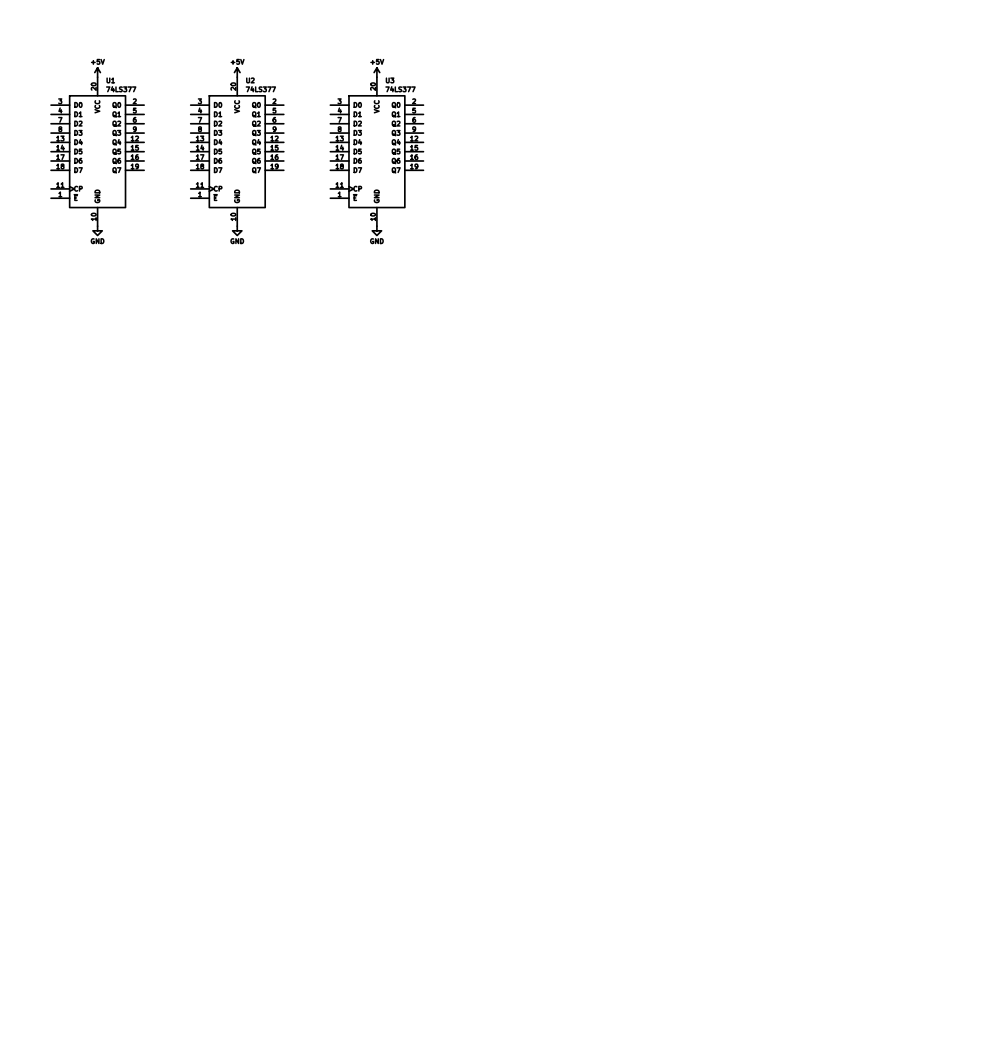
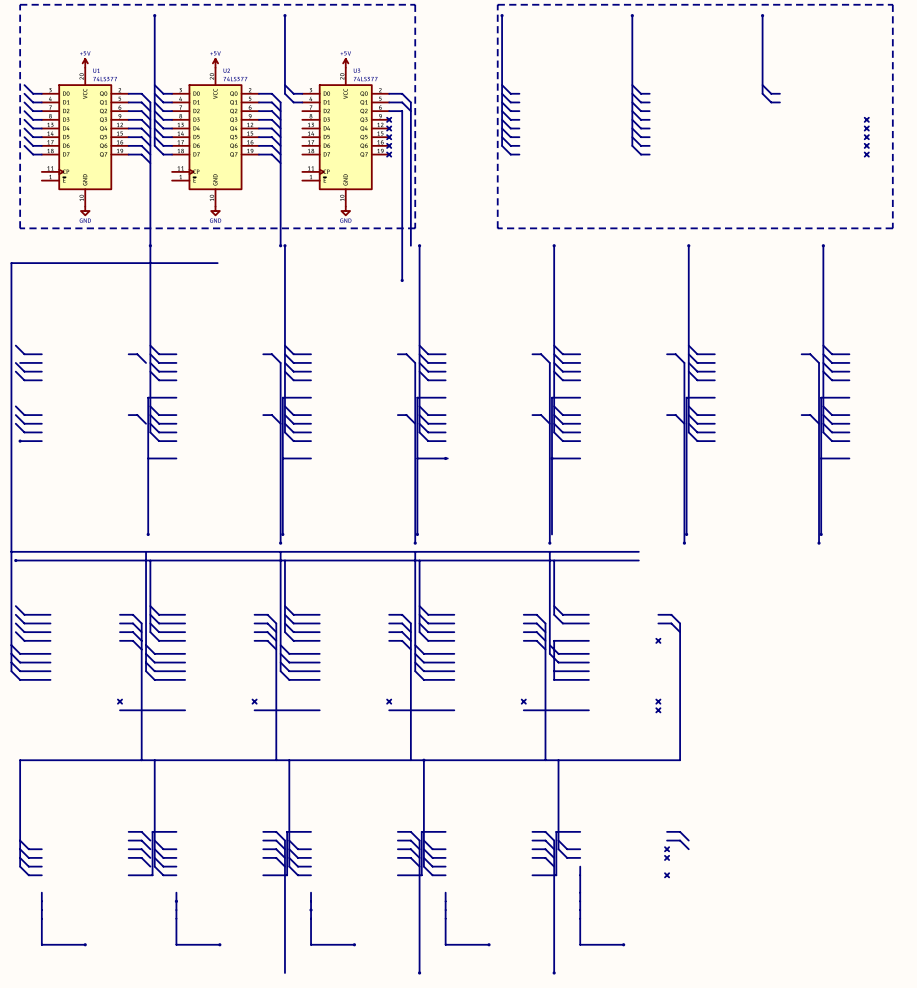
line: none -> (20, 4) (415, 4) (415, 228) (20, 228) (20, 4)
line: none -> (497, 4) (892, 4) (892, 228) (497, 228) (497, 4)
bus: none -> (154, 15) (154, 145)
junction: none -> (154, 15)
bus: none -> (284, 15) (284, 93)
junction: none -> (284, 15)
bus: none -> (502, 15) (502, 145)
junction: none -> (502, 15)
bus: none -> (632, 15) (632, 145)
junction: none -> (632, 15)
bus: none -> (762, 15) (762, 93)
junction: none -> (762, 15)
wire: none -> (24, 85) (33, 93) (41, 93)
wire: none -> (154, 85) (163, 93) (172, 93)
wire: none -> (284, 85) (293, 93) (302, 93)
wire: none -> (502, 85) (510, 93) (519, 93)
wire: none -> (632, 85) (641, 93) (649, 93)
wire: none -> (762, 85) (771, 93) (779, 93)
wire: none -> (24, 93) (33, 102) (41, 102)
wire: none -> (128, 93) (141, 93) (150, 102)
wire: none -> (154, 93) (163, 102) (172, 102)
wire: none -> (258, 93) (271, 93) (280, 102)
wire: none -> (284, 93) (293, 102) (302, 102)
wire: none -> (389, 93) (402, 93) (410, 102)
wire: none -> (502, 93) (510, 102) (519, 102)
wire: none -> (632, 93) (641, 102) (649, 102)
wire: none -> (762, 93) (771, 102) (779, 102)
wire: none -> (24, 102) (33, 111) (41, 111)
wire: none -> (128, 102) (141, 102) (150, 111)
bus: none -> (150, 102) (150, 432)
wire: none -> (154, 102) (163, 111) (172, 111)
wire: none -> (258, 102) (271, 102) (280, 111)
bus: none -> (280, 102) (280, 245)
wire: none -> (389, 102) (402, 102) (410, 111)
bus: none -> (410, 102) (410, 245)
wire: none -> (502, 102) (510, 111) (519, 111)
wire: none -> (632, 102) (641, 111) (649, 111)
wire: none -> (24, 111) (33, 119) (41, 119)
wire: none -> (128, 111) (141, 111) (150, 119)
wire: none -> (154, 111) (163, 119) (172, 119)
wire: none -> (258, 111) (271, 111) (280, 119)
wire: none -> (389, 111) (402, 111) (402, 280)
wire: none -> (502, 111) (510, 119) (519, 119)
wire: none -> (632, 111) (641, 119) (649, 119)
wire: none -> (24, 119) (33, 128) (41, 128)
wire: none -> (128, 119) (141, 119) (150, 128)
wire: none -> (154, 119) (163, 128) (172, 128)
wire: none -> (258, 119) (271, 119) (280, 128)
no-connect mark: none -> (389, 119)
wire: none -> (502, 119) (510, 128) (519, 128)
wire: none -> (632, 119) (641, 128) (649, 128)
no-connect mark: none -> (866, 119)
wire: none -> (24, 128) (33, 137) (41, 137)
wire: none -> (128, 128) (141, 128) (150, 137)
wire: none -> (154, 128) (163, 137) (172, 137)
wire: none -> (258, 128) (271, 128) (280, 137)
no-connect mark: none -> (389, 128)
wire: none -> (502, 128) (510, 137) (519, 137)
wire: none -> (632, 128) (641, 137) (649, 137)
no-connect mark: none -> (866, 128)
wire: none -> (24, 137) (33, 145) (41, 145)
wire: none -> (128, 137) (141, 137) (150, 145)
wire: none -> (154, 137) (163, 145) (172, 145)
wire: none -> (258, 137) (271, 137) (280, 145)
no-connect mark: none -> (389, 137)
wire: none -> (502, 137) (510, 145) (519, 145)
wire: none -> (632, 137) (641, 145) (649, 145)
no-connect mark: none -> (866, 137)
wire: none -> (24, 145) (33, 154) (41, 154)
wire: none -> (128, 145) (141, 145) (150, 154)
wire: none -> (154, 145) (163, 154) (172, 154)
wire: none -> (258, 145) (271, 145) (280, 154)
no-connect mark: none -> (389, 145)
wire: none -> (502, 145) (510, 154) (519, 154)
wire: none -> (632, 145) (641, 154) (649, 154)
no-connect mark: none -> (866, 145)
wire: none -> (128, 154) (141, 154) (150, 163)
wire: none -> (258, 154) (271, 154) (280, 163)
no-connect mark: none -> (389, 154)
no-connect mark: none -> (866, 154)
junction: none -> (150, 245)
junction: none -> (280, 245)
bus: none -> (284, 245) (284, 432)
junction: none -> (284, 245)
bus: none -> (419, 245) (419, 432)
junction: none -> (419, 245)
bus: none -> (554, 245) (554, 432)
junction: none -> (554, 245)
bus: none -> (688, 245) (688, 432)
junction: none -> (688, 245)
bus: none -> (823, 245) (823, 432)
junction: none -> (823, 245)
bus: none -> (217, 263) (11, 263) (11, 671)
junction: none -> (402, 280)
wire: none -> (15, 345) (24, 354) (41, 354)
wire: none -> (150, 345) (159, 354) (176, 354)
wire: none -> (284, 345) (293, 354) (311, 354)
wire: none -> (419, 345) (428, 354) (445, 354)
wire: none -> (554, 345) (562, 354) (580, 354)
wire: none -> (688, 345) (697, 354) (714, 354)
wire: none -> (823, 345) (832, 354) (849, 354)
wire: none -> (128, 354) (137, 354) (146, 362)
wire: none -> (150, 354) (159, 362) (176, 362)
wire: none -> (263, 354) (271, 354) (280, 362)
wire: none -> (284, 354) (293, 362) (311, 362)
wire: none -> (397, 354) (406, 354) (415, 362)
wire: none -> (419, 354) (428, 362) (445, 362)
wire: none -> (532, 354) (541, 354) (549, 362)
wire: none -> (554, 354) (562, 362) (580, 362)
wire: none -> (667, 354) (675, 354) (684, 362)
wire: none -> (688, 354) (697, 362) (714, 362)
wire: none -> (801, 354) (810, 354) (819, 362)
wire: none -> (823, 354) (832, 362) (849, 362)
wire: none -> (15, 362) (24, 371) (41, 371)
wire: none -> (20, 362) (41, 362)
wire: none -> (150, 362) (159, 371) (176, 371)
bus: none -> (280, 362) (280, 543)
wire: none -> (284, 362) (293, 371) (311, 371)
bus: none -> (415, 362) (415, 543)
wire: none -> (419, 362) (428, 371) (445, 371)
bus: none -> (549, 362) (549, 543)
wire: none -> (554, 362) (562, 371) (580, 371)
bus: none -> (684, 362) (684, 543)
wire: none -> (688, 362) (697, 371) (714, 371)
bus: none -> (819, 362) (819, 543)
wire: none -> (823, 362) (832, 371) (849, 371)
wire: none -> (15, 371) (24, 380) (41, 380)
wire: none -> (150, 371) (159, 380) (176, 380)
wire: none -> (284, 371) (293, 380) (311, 380)
wire: none -> (419, 371) (428, 380) (445, 380)
wire: none -> (554, 371) (562, 380) (580, 380)
wire: none -> (688, 371) (697, 380) (714, 380)
wire: none -> (823, 371) (832, 380) (849, 380)
wire: none -> (176, 397) (148, 397) (148, 534)
wire: none -> (311, 397) (282, 397) (282, 534)
wire: none -> (445, 397) (417, 397) (417, 534)
wire: none -> (580, 397) (552, 397) (552, 534)
wire: none -> (714, 397) (686, 397) (686, 534)
wire: none -> (849, 397) (821, 397) (821, 534)
wire: none -> (15, 406) (24, 415) (41, 415)
wire: none -> (150, 406) (159, 415) (176, 415)
wire: none -> (284, 406) (293, 415) (311, 415)
wire: none -> (419, 406) (428, 415) (445, 415)
wire: none -> (554, 406) (562, 415) (580, 415)
wire: none -> (688, 406) (697, 415) (714, 415)
wire: none -> (823, 406) (832, 415) (849, 415)
wire: none -> (15, 415) (24, 423) (41, 423)
wire: none -> (128, 415) (137, 415) (146, 423)
wire: none -> (150, 415) (159, 423) (176, 423)
wire: none -> (263, 415) (271, 415) (280, 423)
wire: none -> (284, 415) (293, 423) (311, 423)
wire: none -> (397, 415) (406, 415) (415, 423)
wire: none -> (419, 415) (428, 423) (445, 423)
wire: none -> (532, 415) (541, 415) (549, 423)
wire: none -> (554, 415) (562, 423) (580, 423)
wire: none -> (667, 415) (675, 415) (684, 423)
wire: none -> (688, 415) (697, 423) (714, 423)
wire: none -> (801, 415) (810, 415) (819, 423)
wire: none -> (823, 415) (832, 423) (849, 423)
wire: none -> (15, 423) (24, 432) (41, 432)
wire: none -> (150, 423) (159, 432) (176, 432)
wire: none -> (284, 423) (293, 432) (311, 432)
wire: none -> (419, 423) (428, 432) (445, 432)
wire: none -> (554, 423) (562, 432) (580, 432)
wire: none -> (688, 423) (697, 432) (714, 432)
wire: none -> (823, 423) (832, 432) (849, 432)
wire: none -> (150, 432) (159, 441) (176, 441)
wire: none -> (284, 432) (293, 441) (311, 441)
wire: none -> (419, 432) (428, 441) (445, 441)
wire: none -> (554, 432) (562, 441) (580, 441)
wire: none -> (688, 432) (697, 441) (714, 441)
wire: none -> (823, 432) (832, 441) (849, 441)
wire: none -> (20, 441) (41, 441)
junction: none -> (20, 441)
wire: none -> (148, 458) (176, 458)
wire: none -> (282, 458) (311, 458)
wire: none -> (417, 458) (447, 458)
junction: none -> (445, 458)
wire: none -> (552, 458) (580, 458)
wire: none -> (821, 458) (849, 458)
junction: none -> (148, 534)
junction: none -> (282, 534)
junction: none -> (417, 534)
junction: none -> (686, 534)
junction: none -> (821, 534)
junction: none -> (280, 543)
junction: none -> (415, 543)
junction: none -> (549, 543)
junction: none -> (684, 543)
junction: none -> (819, 543)
bus: none -> (11, 551) (638, 551)
bus: none -> (146, 551) (146, 671)
bus: none -> (280, 551) (280, 671)
bus: none -> (415, 551) (415, 671)
bus: none -> (549, 551) (549, 653)
bus: none -> (15, 560) (638, 560)
junction: none -> (15, 560)
bus: none -> (150, 560) (150, 632)
bus: none -> (284, 560) (284, 632)
bus: none -> (419, 560) (419, 632)
bus: none -> (554, 560) (554, 614)
wire: none -> (15, 606) (24, 614) (50, 614)
wire: none -> (150, 606) (159, 614) (185, 614)
wire: none -> (284, 606) (293, 614) (319, 614)
wire: none -> (419, 606) (428, 614) (454, 614)
wire: none -> (554, 606) (562, 614) (588, 614)
wire: none -> (15, 614) (24, 623) (50, 623)
wire: none -> (119, 614) (133, 614) (141, 623)
wire: none -> (150, 614) (159, 623) (185, 623)
wire: none -> (254, 614) (267, 614) (276, 623)
wire: none -> (284, 614) (293, 623) (319, 623)
wire: none -> (389, 614) (402, 614) (410, 623)
wire: none -> (419, 614) (428, 623) (454, 623)
wire: none -> (523, 614) (536, 614) (545, 623)
wire: none -> (554, 614) (562, 623) (588, 623)
wire: none -> (658, 614) (671, 614) (680, 623)
wire: none -> (15, 623) (24, 632) (50, 632)
wire: none -> (119, 623) (133, 623) (141, 632)
bus: none -> (141, 623) (141, 760)
wire: none -> (150, 623) (159, 632) (185, 632)
wire: none -> (254, 623) (267, 623) (276, 632)
bus: none -> (276, 623) (276, 760)
wire: none -> (284, 623) (293, 632) (319, 632)
wire: none -> (389, 623) (402, 623) (410, 632)
bus: none -> (410, 623) (410, 760)
wire: none -> (419, 623) (428, 632) (454, 632)
wire: none -> (523, 623) (536, 623) (545, 632)
bus: none -> (545, 623) (545, 760)
wire: none -> (658, 623) (671, 623) (680, 632)
bus: none -> (680, 623) (680, 760) (20, 760) (20, 866)
wire: none -> (15, 632) (24, 640) (50, 640)
wire: none -> (119, 632) (133, 632) (141, 640)
wire: none -> (150, 632) (159, 640) (185, 640)
wire: none -> (254, 632) (267, 632) (276, 640)
wire: none -> (284, 632) (293, 640) (319, 640)
wire: none -> (389, 632) (402, 632) (410, 640)
wire: none -> (419, 632) (428, 640) (454, 640)
wire: none -> (523, 632) (536, 632) (545, 640)
wire: none -> (119, 640) (133, 640) (141, 649)
wire: none -> (254, 640) (267, 640) (276, 649)
wire: none -> (389, 640) (402, 640) (410, 649)
wire: none -> (523, 640) (536, 640) (545, 649)
wire: none -> (588, 640) (554, 640) (554, 679) (588, 679)
no-connect mark: none -> (658, 640)
wire: none -> (11, 645) (20, 653) (50, 653)
wire: none -> (146, 645) (154, 653) (185, 653)
wire: none -> (280, 645) (289, 653) (319, 653)
wire: none -> (415, 645) (423, 653) (454, 653)
wire: none -> (549, 645) (558, 653) (588, 653)
wire: none -> (11, 653) (20, 662) (50, 662)
wire: none -> (146, 653) (154, 662) (185, 662)
wire: none -> (280, 653) (289, 662) (319, 662)
wire: none -> (415, 653) (423, 662) (454, 662)
wire: none -> (549, 653) (558, 662) (588, 662)
wire: none -> (11, 662) (20, 671) (50, 671)
wire: none -> (146, 662) (154, 671) (185, 671)
wire: none -> (280, 662) (289, 671) (319, 671)
wire: none -> (415, 662) (423, 671) (454, 671)
wire: none -> (11, 671) (20, 679) (50, 679)
wire: none -> (146, 671) (154, 679) (185, 679)
wire: none -> (280, 671) (289, 679) (319, 679)
wire: none -> (415, 671) (423, 679) (454, 679)
wire: none -> (554, 671) (588, 671)
no-connect mark: none -> (119, 701)
no-connect mark: none -> (254, 701)
no-connect mark: none -> (389, 701)
no-connect mark: none -> (523, 701)
no-connect mark: none -> (658, 701)
wire: none -> (119, 710) (185, 710)
wire: none -> (254, 710) (319, 710)
wire: none -> (389, 710) (454, 710)
wire: none -> (523, 710) (588, 710)
no-connect mark: none -> (658, 710)
bus: none -> (154, 760) (154, 866)
bus: none -> (289, 760) (289, 866)
bus: none -> (423, 760) (423, 866)
bus: none -> (558, 760) (558, 849)
wire: none -> (128, 831) (141, 831) (150, 840)
wire: none -> (176, 831) (152, 831) (152, 875) (128, 875)
wire: none -> (263, 831) (276, 831) (284, 840)
wire: none -> (311, 831) (287, 831) (287, 875) (263, 875)
wire: none -> (397, 831) (410, 831) (419, 840)
wire: none -> (445, 831) (421, 831) (421, 875) (397, 875)
wire: none -> (532, 831) (545, 831) (554, 840)
wire: none -> (580, 831) (556, 831) (556, 875) (532, 875)
wire: none -> (667, 831) (680, 831) (688, 840)
wire: none -> (20, 840) (28, 849) (41, 849)
wire: none -> (128, 840) (141, 840) (150, 849)
wire: none -> (154, 840) (163, 849) (176, 849)
wire: none -> (263, 840) (276, 840) (284, 849)
bus: none -> (284, 840) (284, 972)
wire: none -> (289, 840) (298, 849) (311, 849)
wire: none -> (397, 840) (410, 840) (419, 849)
bus: none -> (419, 840) (419, 972)
wire: none -> (423, 840) (432, 849) (445, 849)
wire: none -> (532, 840) (545, 840) (554, 849)
bus: none -> (554, 840) (554, 972)
wire: none -> (558, 840) (567, 849) (580, 849)
wire: none -> (667, 840) (680, 840) (688, 849)
wire: none -> (20, 849) (28, 857) (41, 857)
wire: none -> (128, 849) (141, 849) (150, 857)
wire: none -> (154, 849) (163, 857) (176, 857)
wire: none -> (263, 849) (276, 849) (284, 857)
wire: none -> (289, 849) (298, 857) (311, 857)
wire: none -> (397, 849) (410, 849) (419, 857)
wire: none -> (423, 849) (432, 857) (445, 857)
wire: none -> (532, 849) (545, 849) (554, 857)
wire: none -> (558, 849) (567, 857) (580, 857)
no-connect mark: none -> (667, 849)
wire: none -> (20, 857) (28, 866) (41, 866)
wire: none -> (128, 857) (141, 857) (150, 866)
wire: none -> (154, 857) (163, 866) (176, 866)
wire: none -> (263, 857) (276, 857) (284, 866)
wire: none -> (289, 857) (298, 866) (311, 866)
wire: none -> (397, 857) (410, 857) (419, 866)
wire: none -> (423, 857) (432, 866) (445, 866)
wire: none -> (532, 857) (545, 857) (554, 866)
no-connect mark: none -> (667, 857)
wire: none -> (20, 866) (28, 875) (41, 875)
wire: none -> (154, 866) (163, 875) (176, 875)
wire: none -> (289, 866) (298, 875) (311, 875)
wire: none -> (423, 866) (432, 875) (445, 875)
wire: none -> (580, 866) (580, 944) (623, 944)
no-connect mark: none -> (667, 875)
wire: none -> (41, 892) (41, 944) (85, 944)
wire: none -> (176, 892) (176, 944) (219, 944)
wire: none -> (311, 892) (311, 944) (354, 944)
wire: none -> (445, 892) (445, 944) (489, 944)
junction: none -> (176, 901)
junction: none -> (85, 944)
junction: none -> (219, 944)
junction: none -> (354, 944)
junction: none -> (489, 944)
junction: none -> (623, 944)
junction: none -> (419, 972)
junction: none -> (554, 972)

